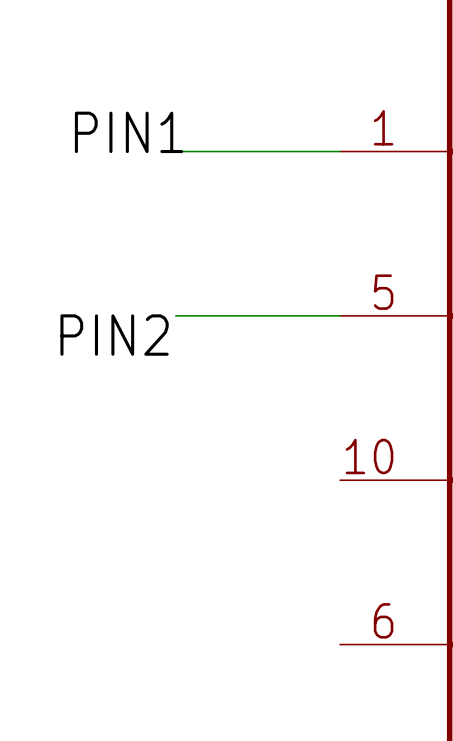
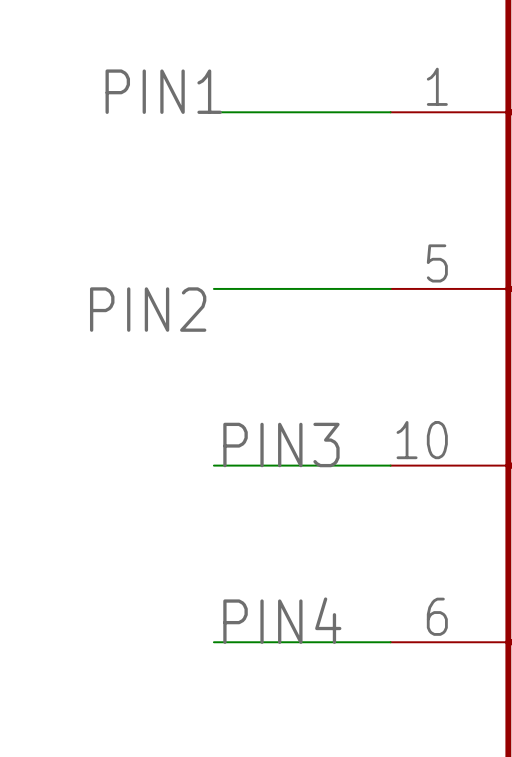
label: none -> PIN3 (281, 444)
wire: none -> (213, 465) (390, 465)
label: none -> PIN4 (282, 620)
wire: none -> (213, 642) (390, 642)

